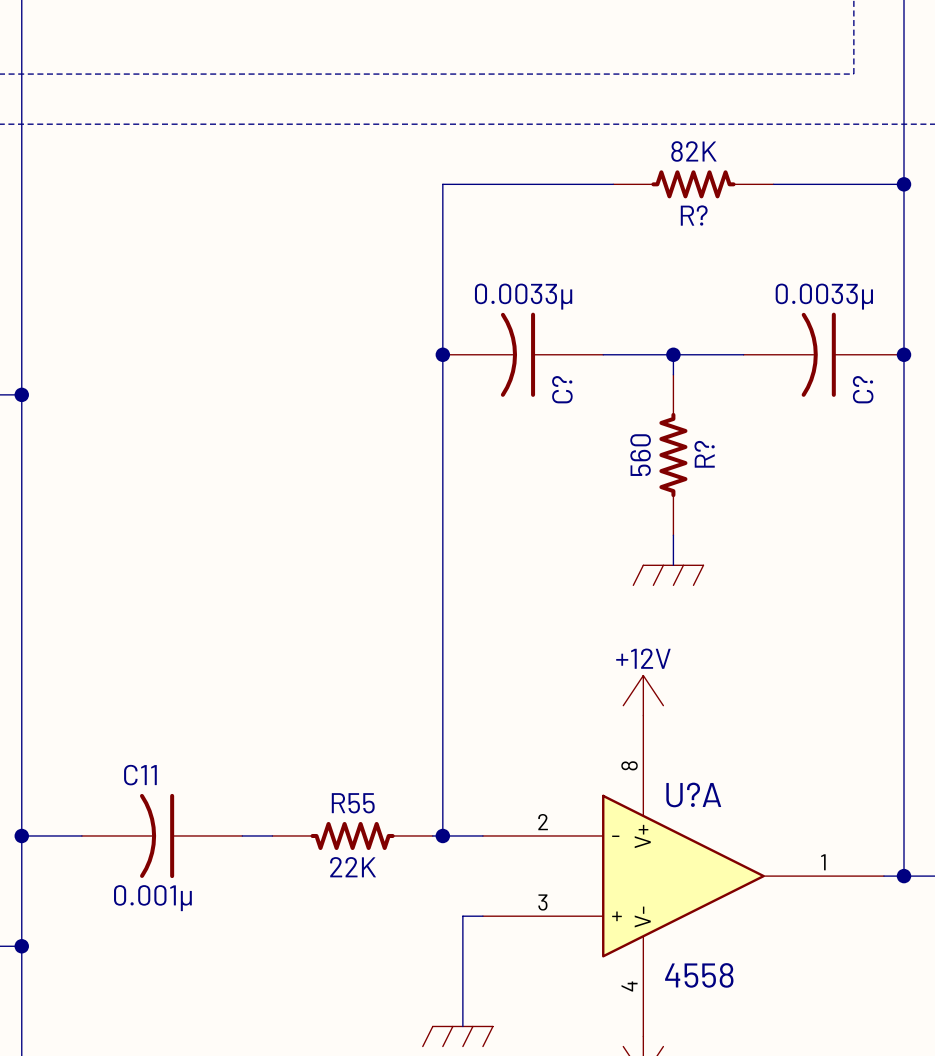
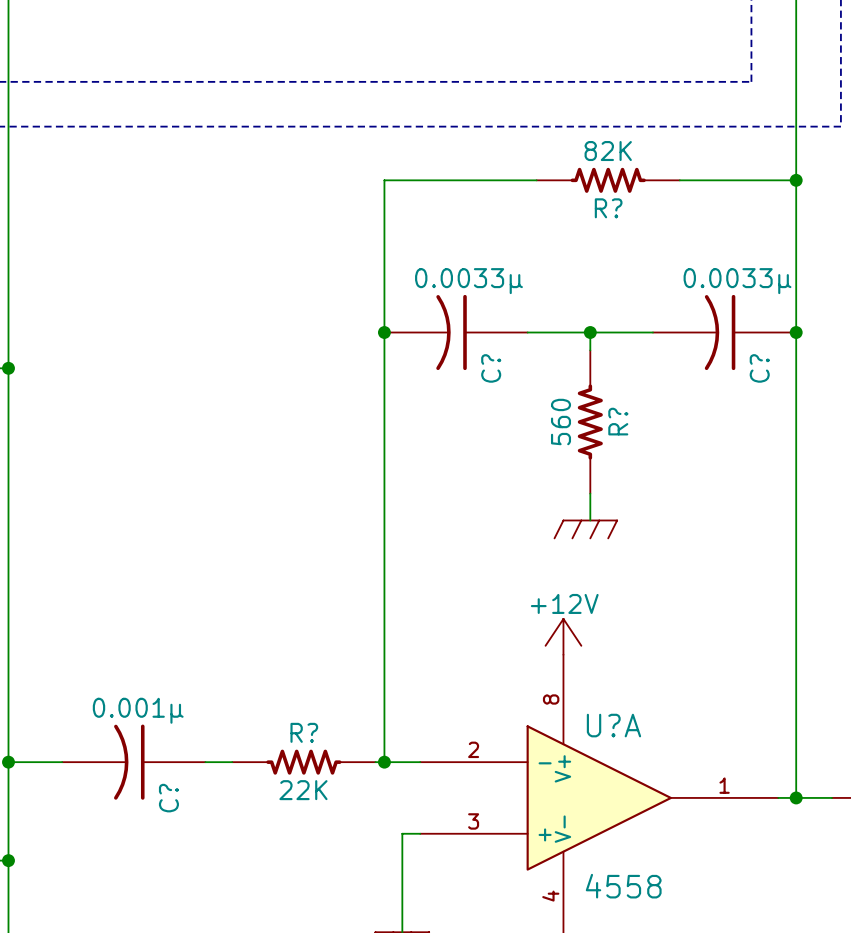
R55 name: R55 (353, 803) -> R? (304, 732)
C11: 0.001μ (162, 835) -> none
C?: none -> 0.001μ (133, 762)

